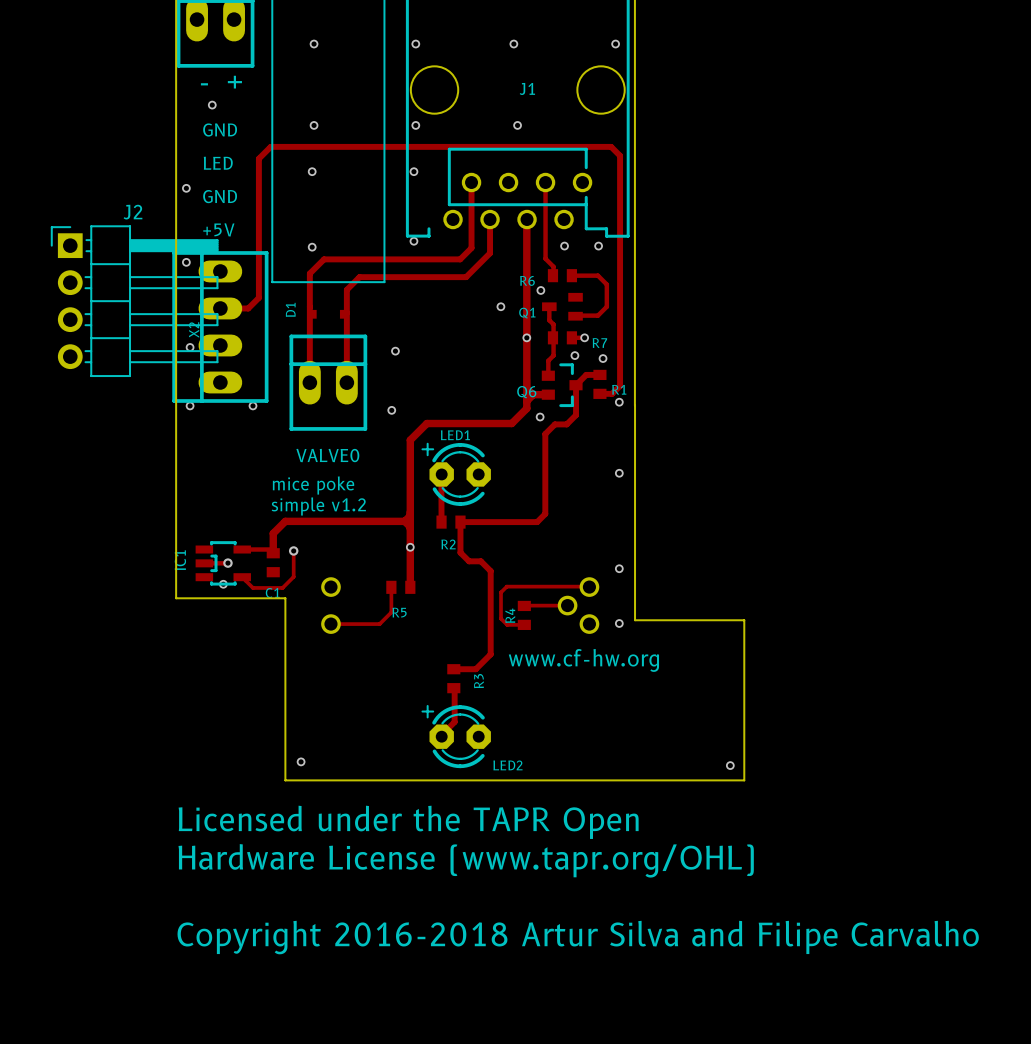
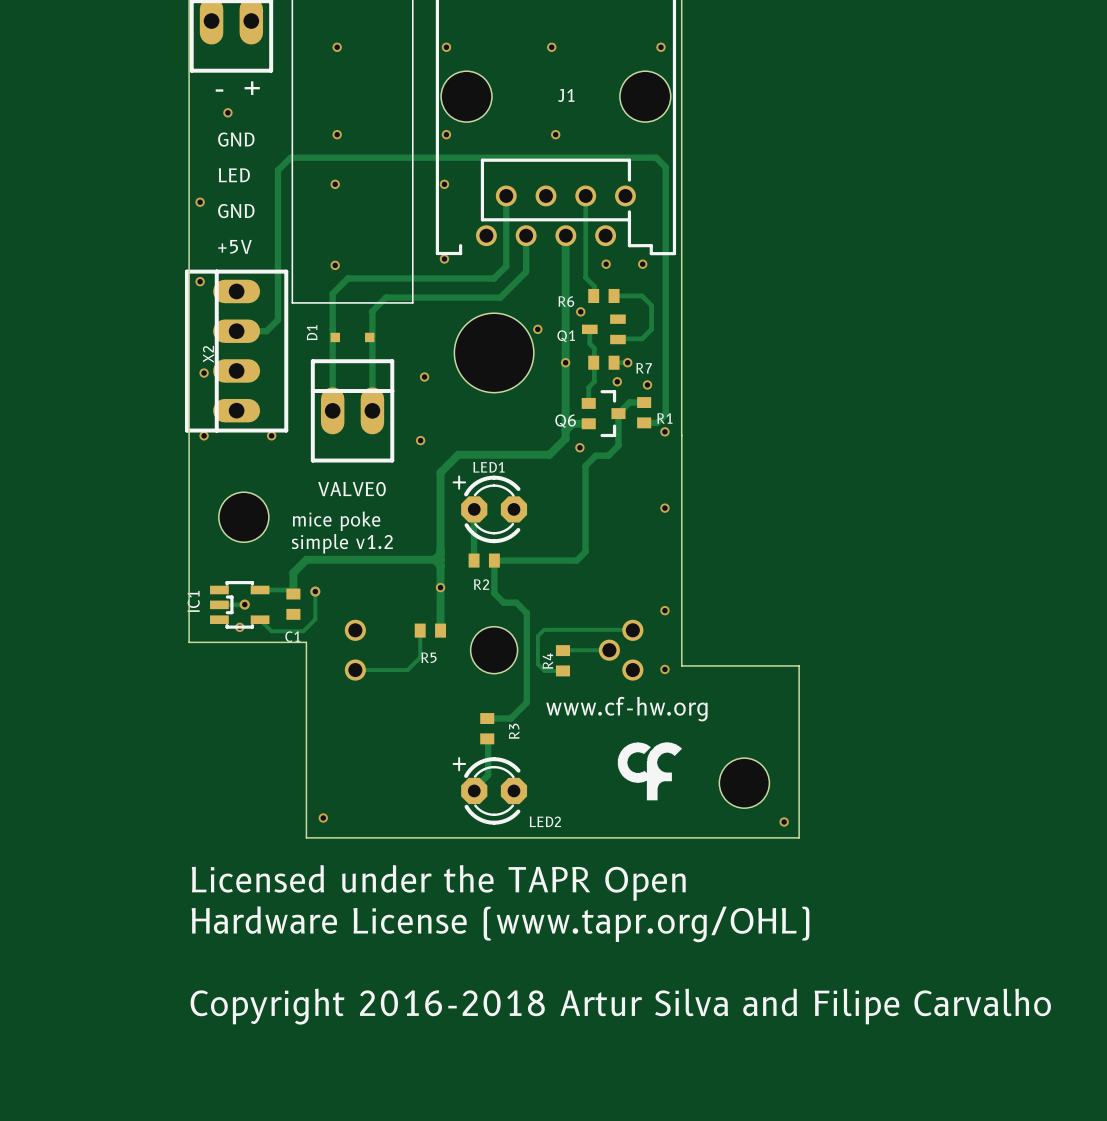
J2: (134, 301) -> none
part: none -> (494, 352)
part: none -> (243, 517)
part: none -> (494, 650)
drawing: none -> [617, 742, 682, 801]
part: none -> (744, 783)

